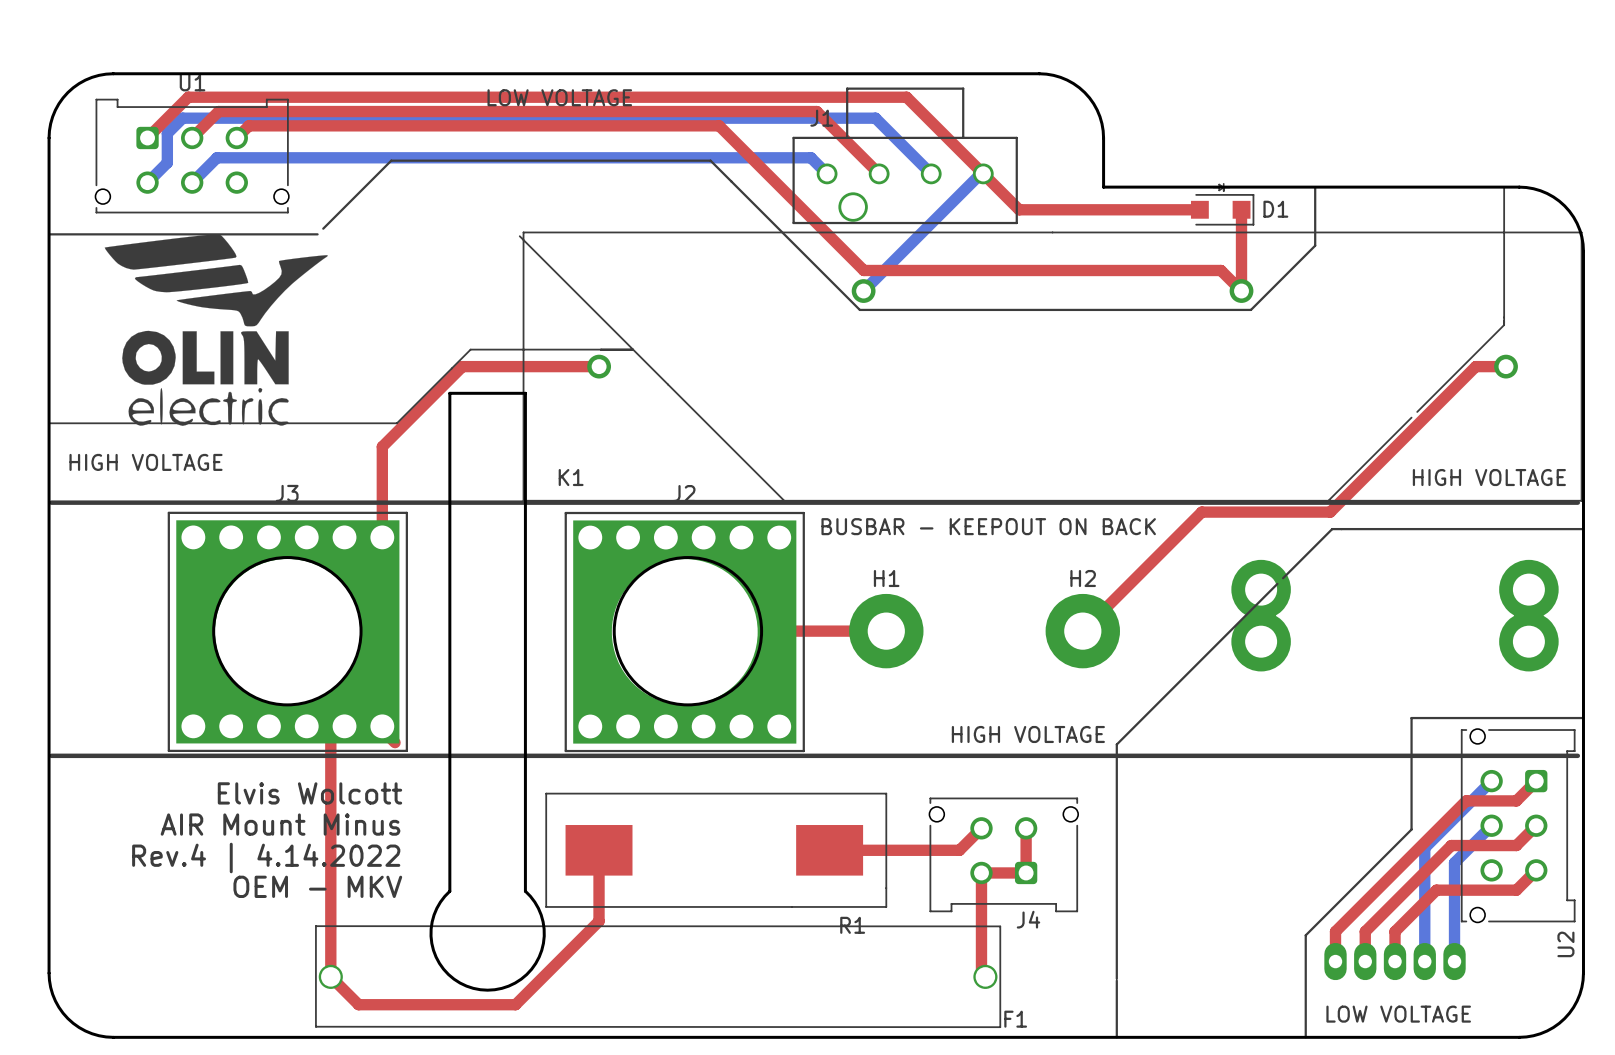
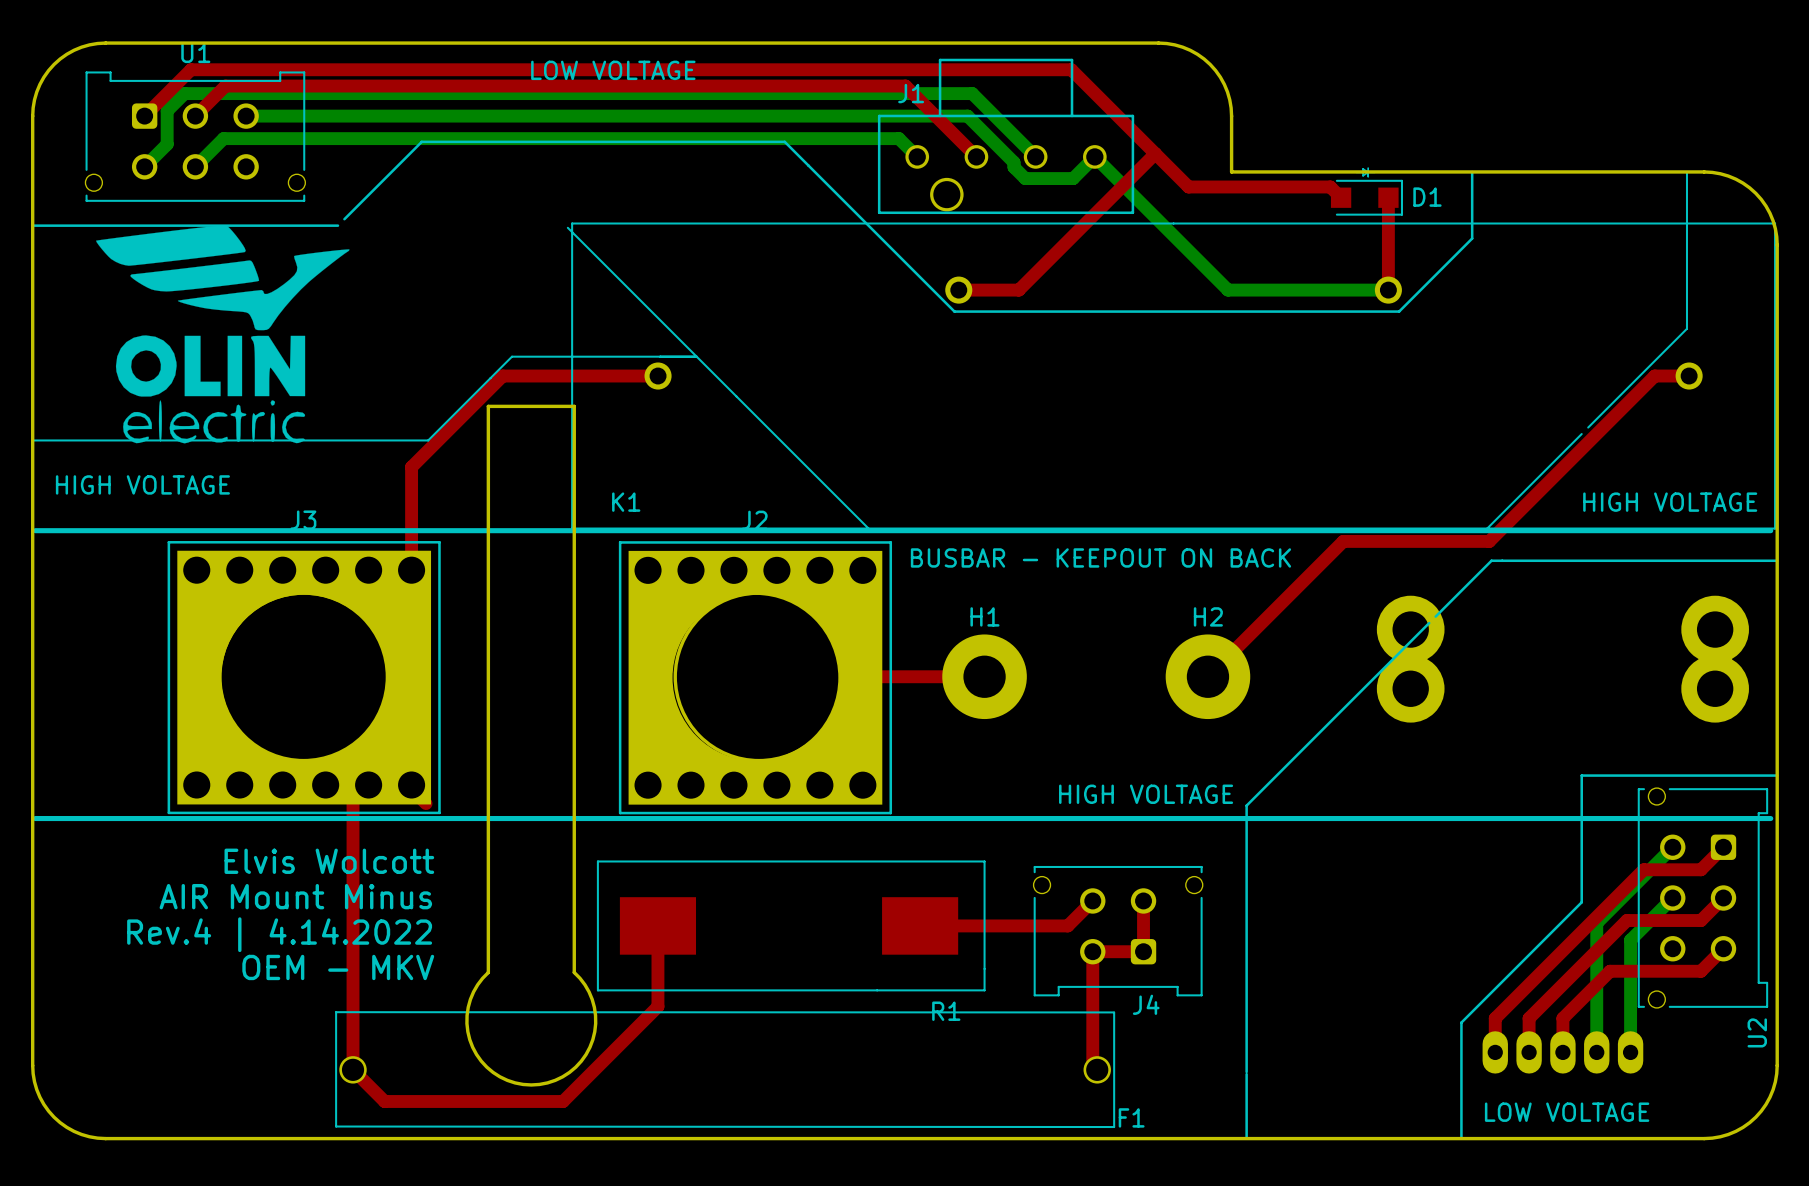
top track: (906, 97) (1019, 209) (1199, 209) -> (1007, 69) (1071, 69) (1188, 186) (1330, 186) (1341, 197)
bottom track: none -> (246, 116) (967, 116) (1014, 162) (1014, 167) (1025, 178) (1073, 178) (1094, 156) (1228, 290) (1388, 290)
top track: (236, 137) (248, 125) (719, 125) (863, 270) (1220, 270) (1241, 291) -> none
top track: none -> (1155, 153) (1018, 290) (961, 290)
bottom track: (980, 173) (863, 291) -> none

